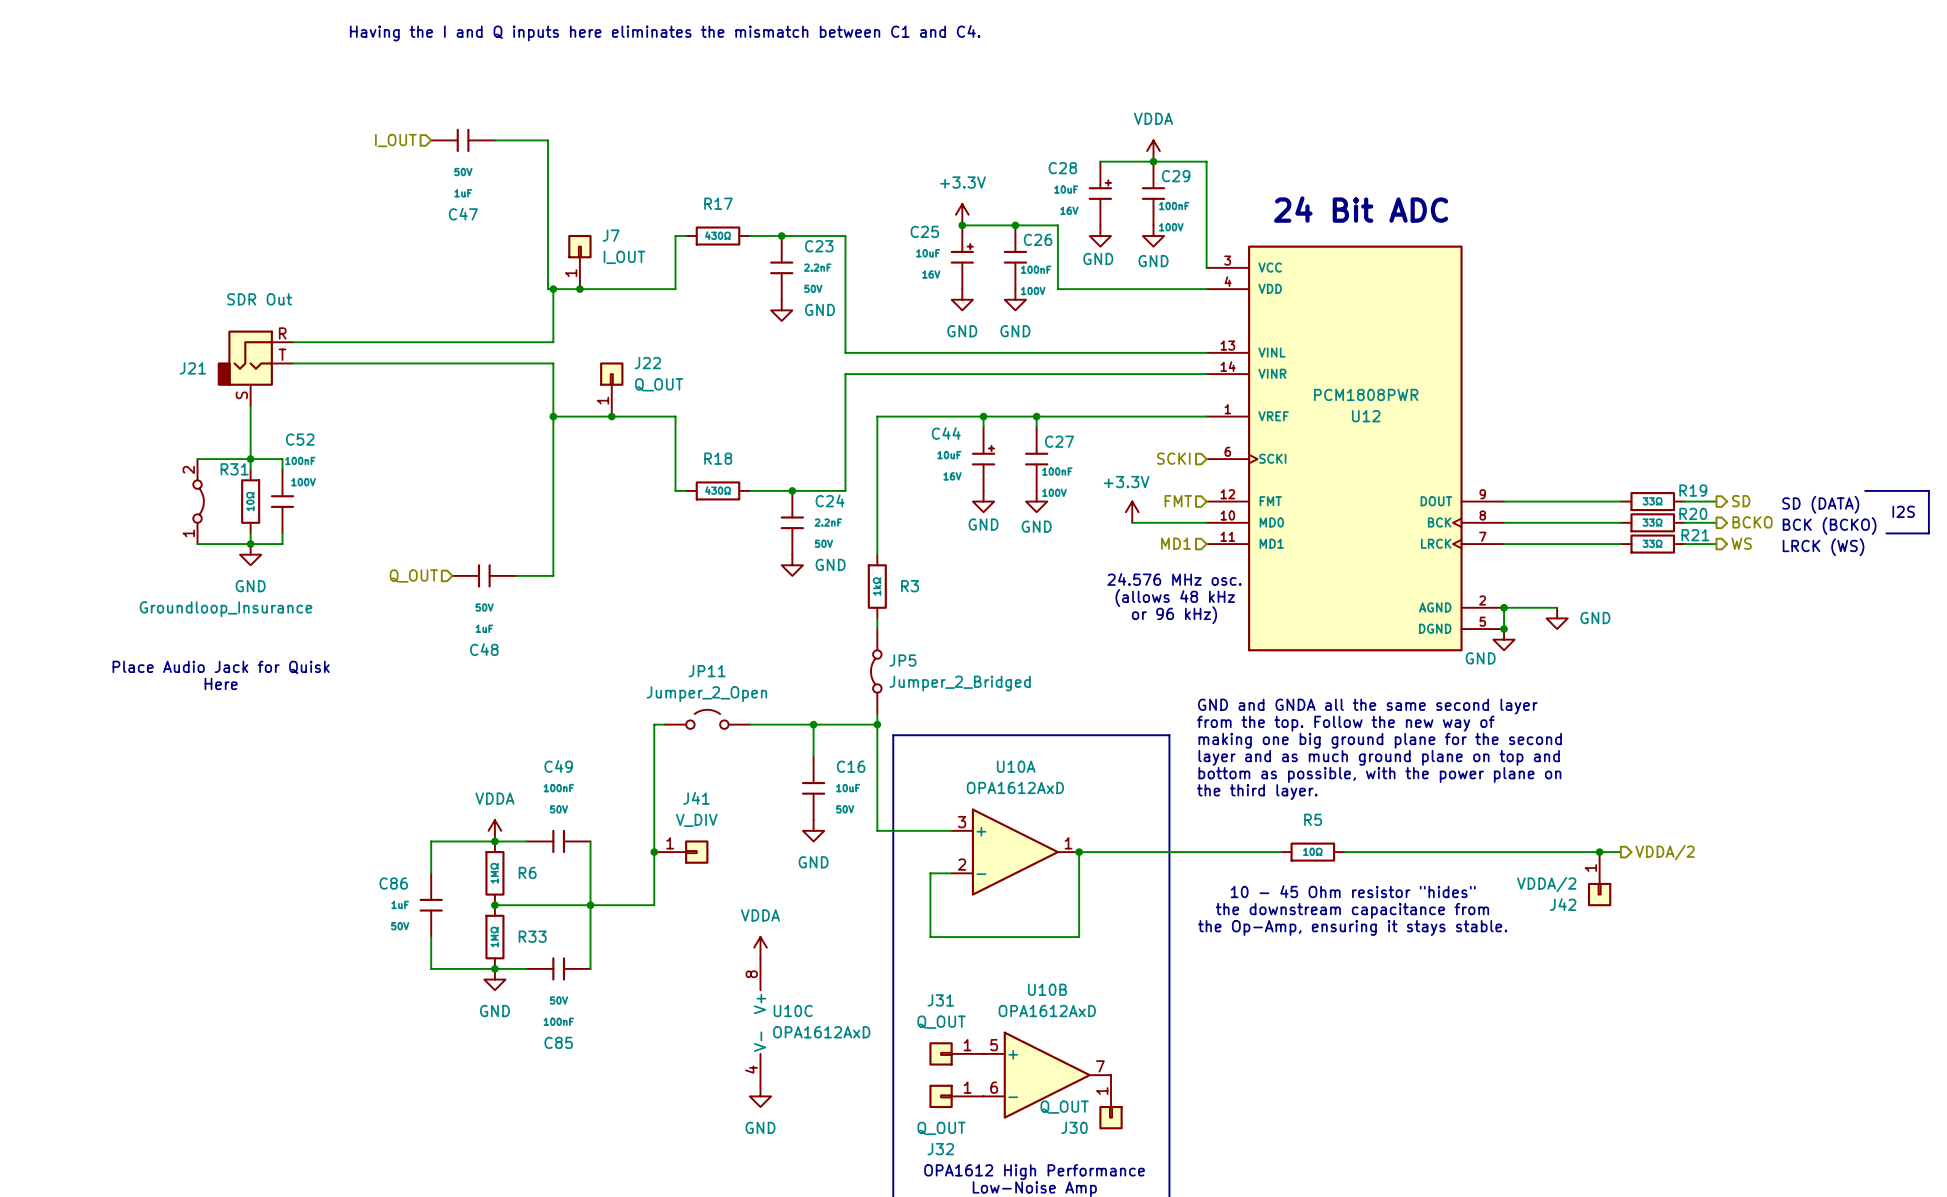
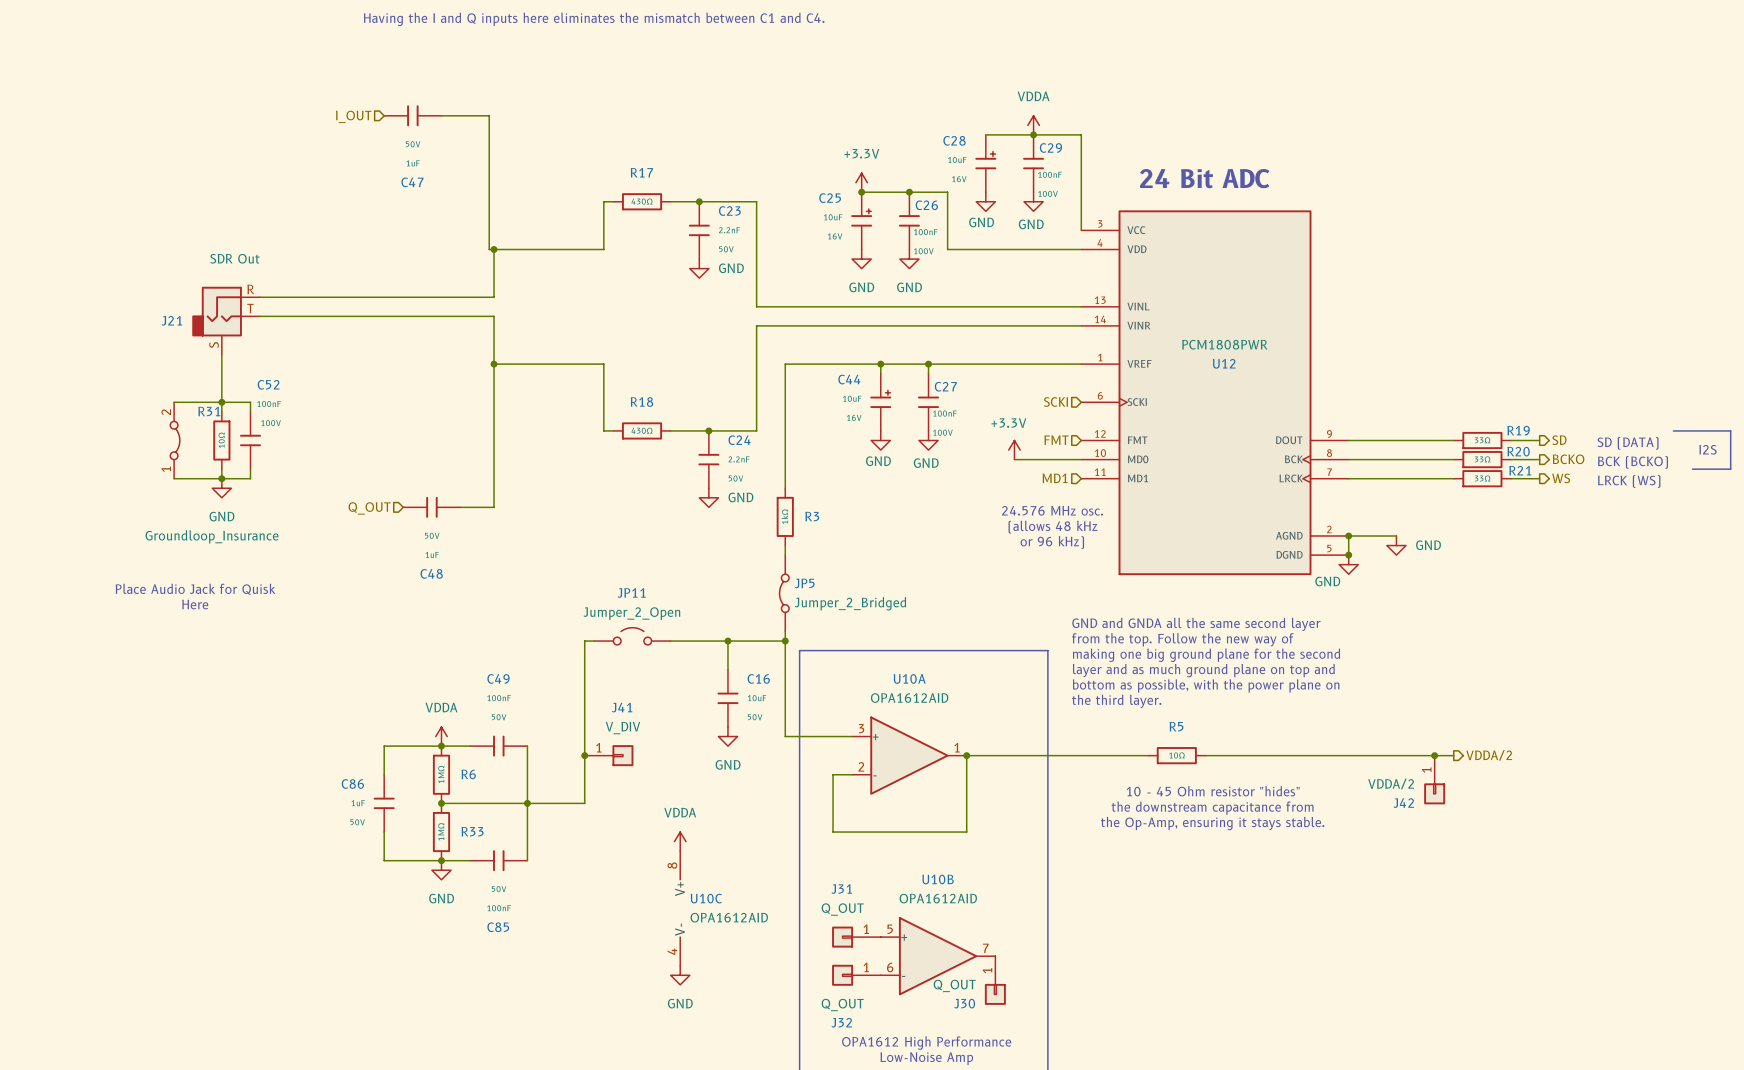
J7: I_OUT (579, 262) -> none
junction: (579, 289) -> none
J22: Q_OUT (611, 389) -> none
junction: (611, 416) -> none
U10A value: OPA1612AxD (1015, 787) -> OPA1612AID (909, 698)
U10B value: OPA1612AxD (1047, 1011) -> OPA1612AID (938, 898)
U10C value: OPA1612AxD (821, 1032) -> OPA1612AID (729, 917)

